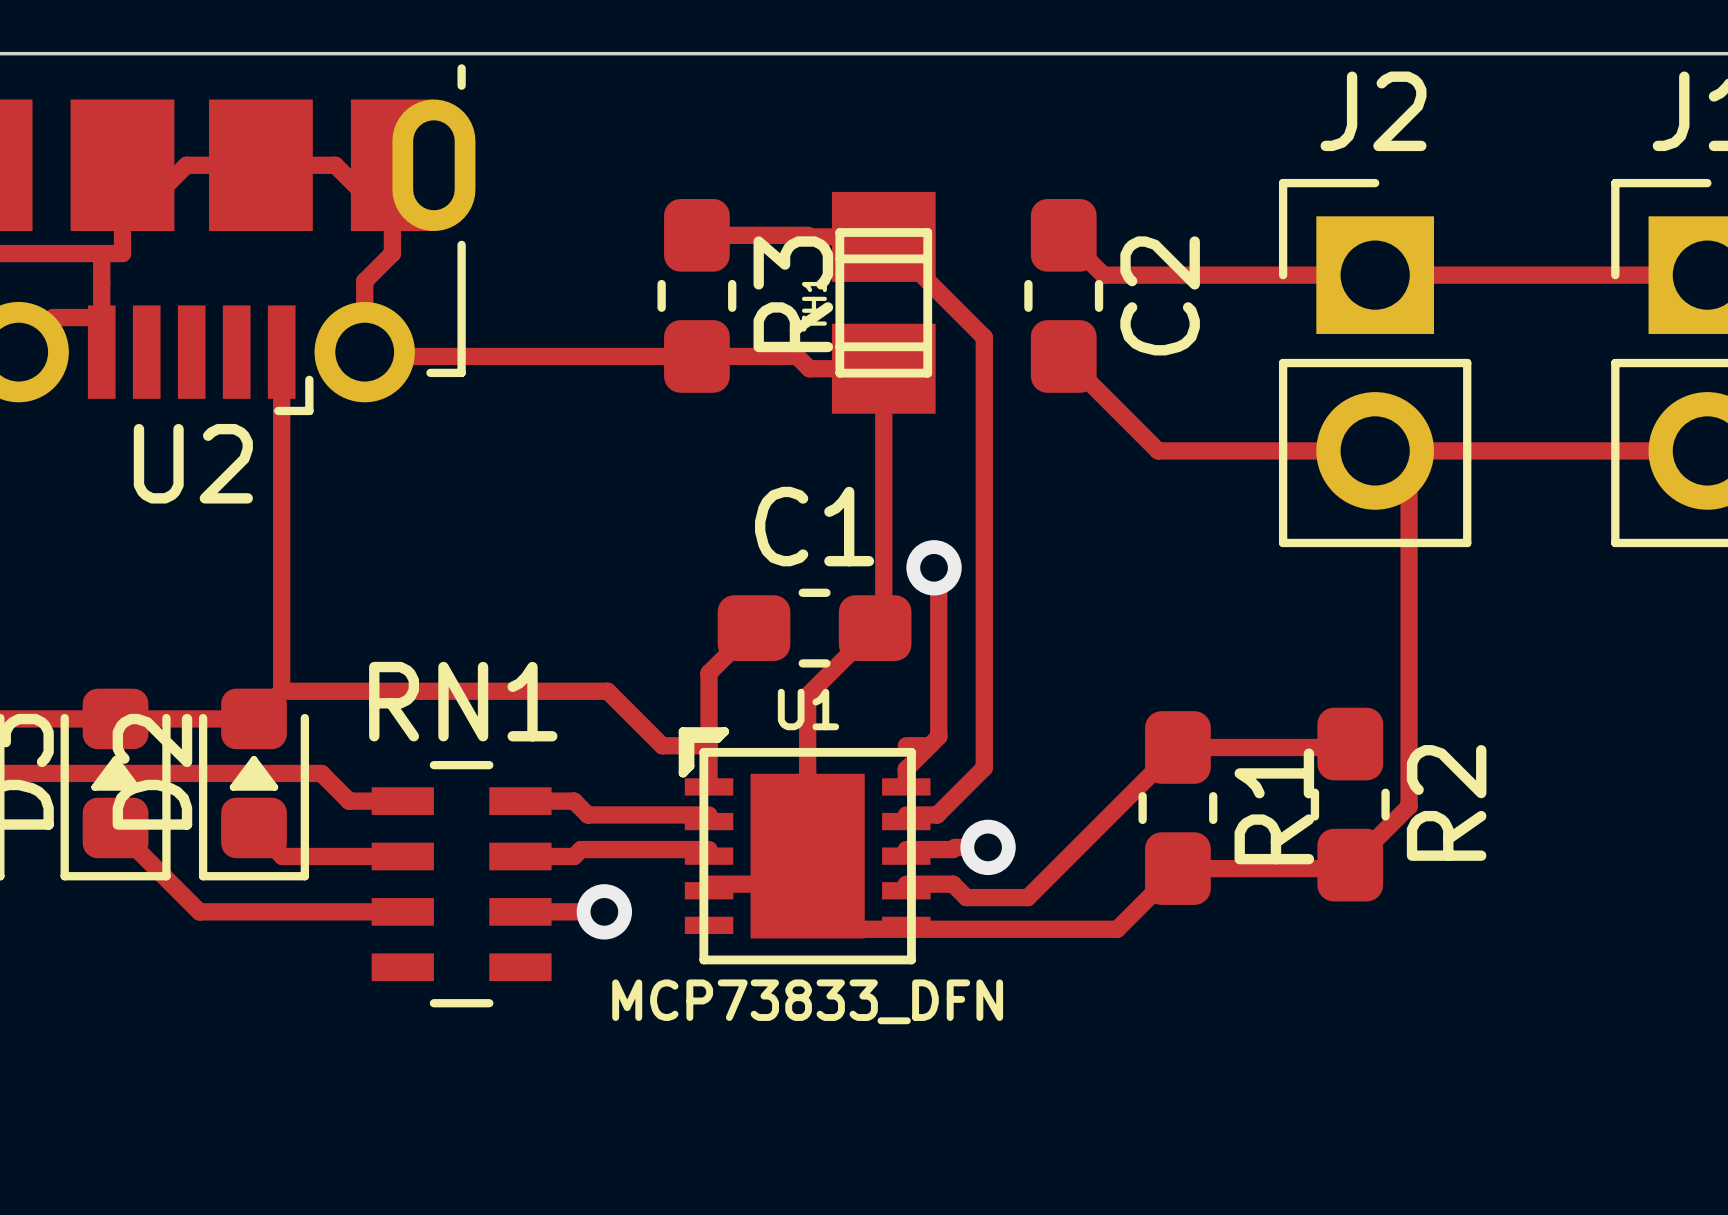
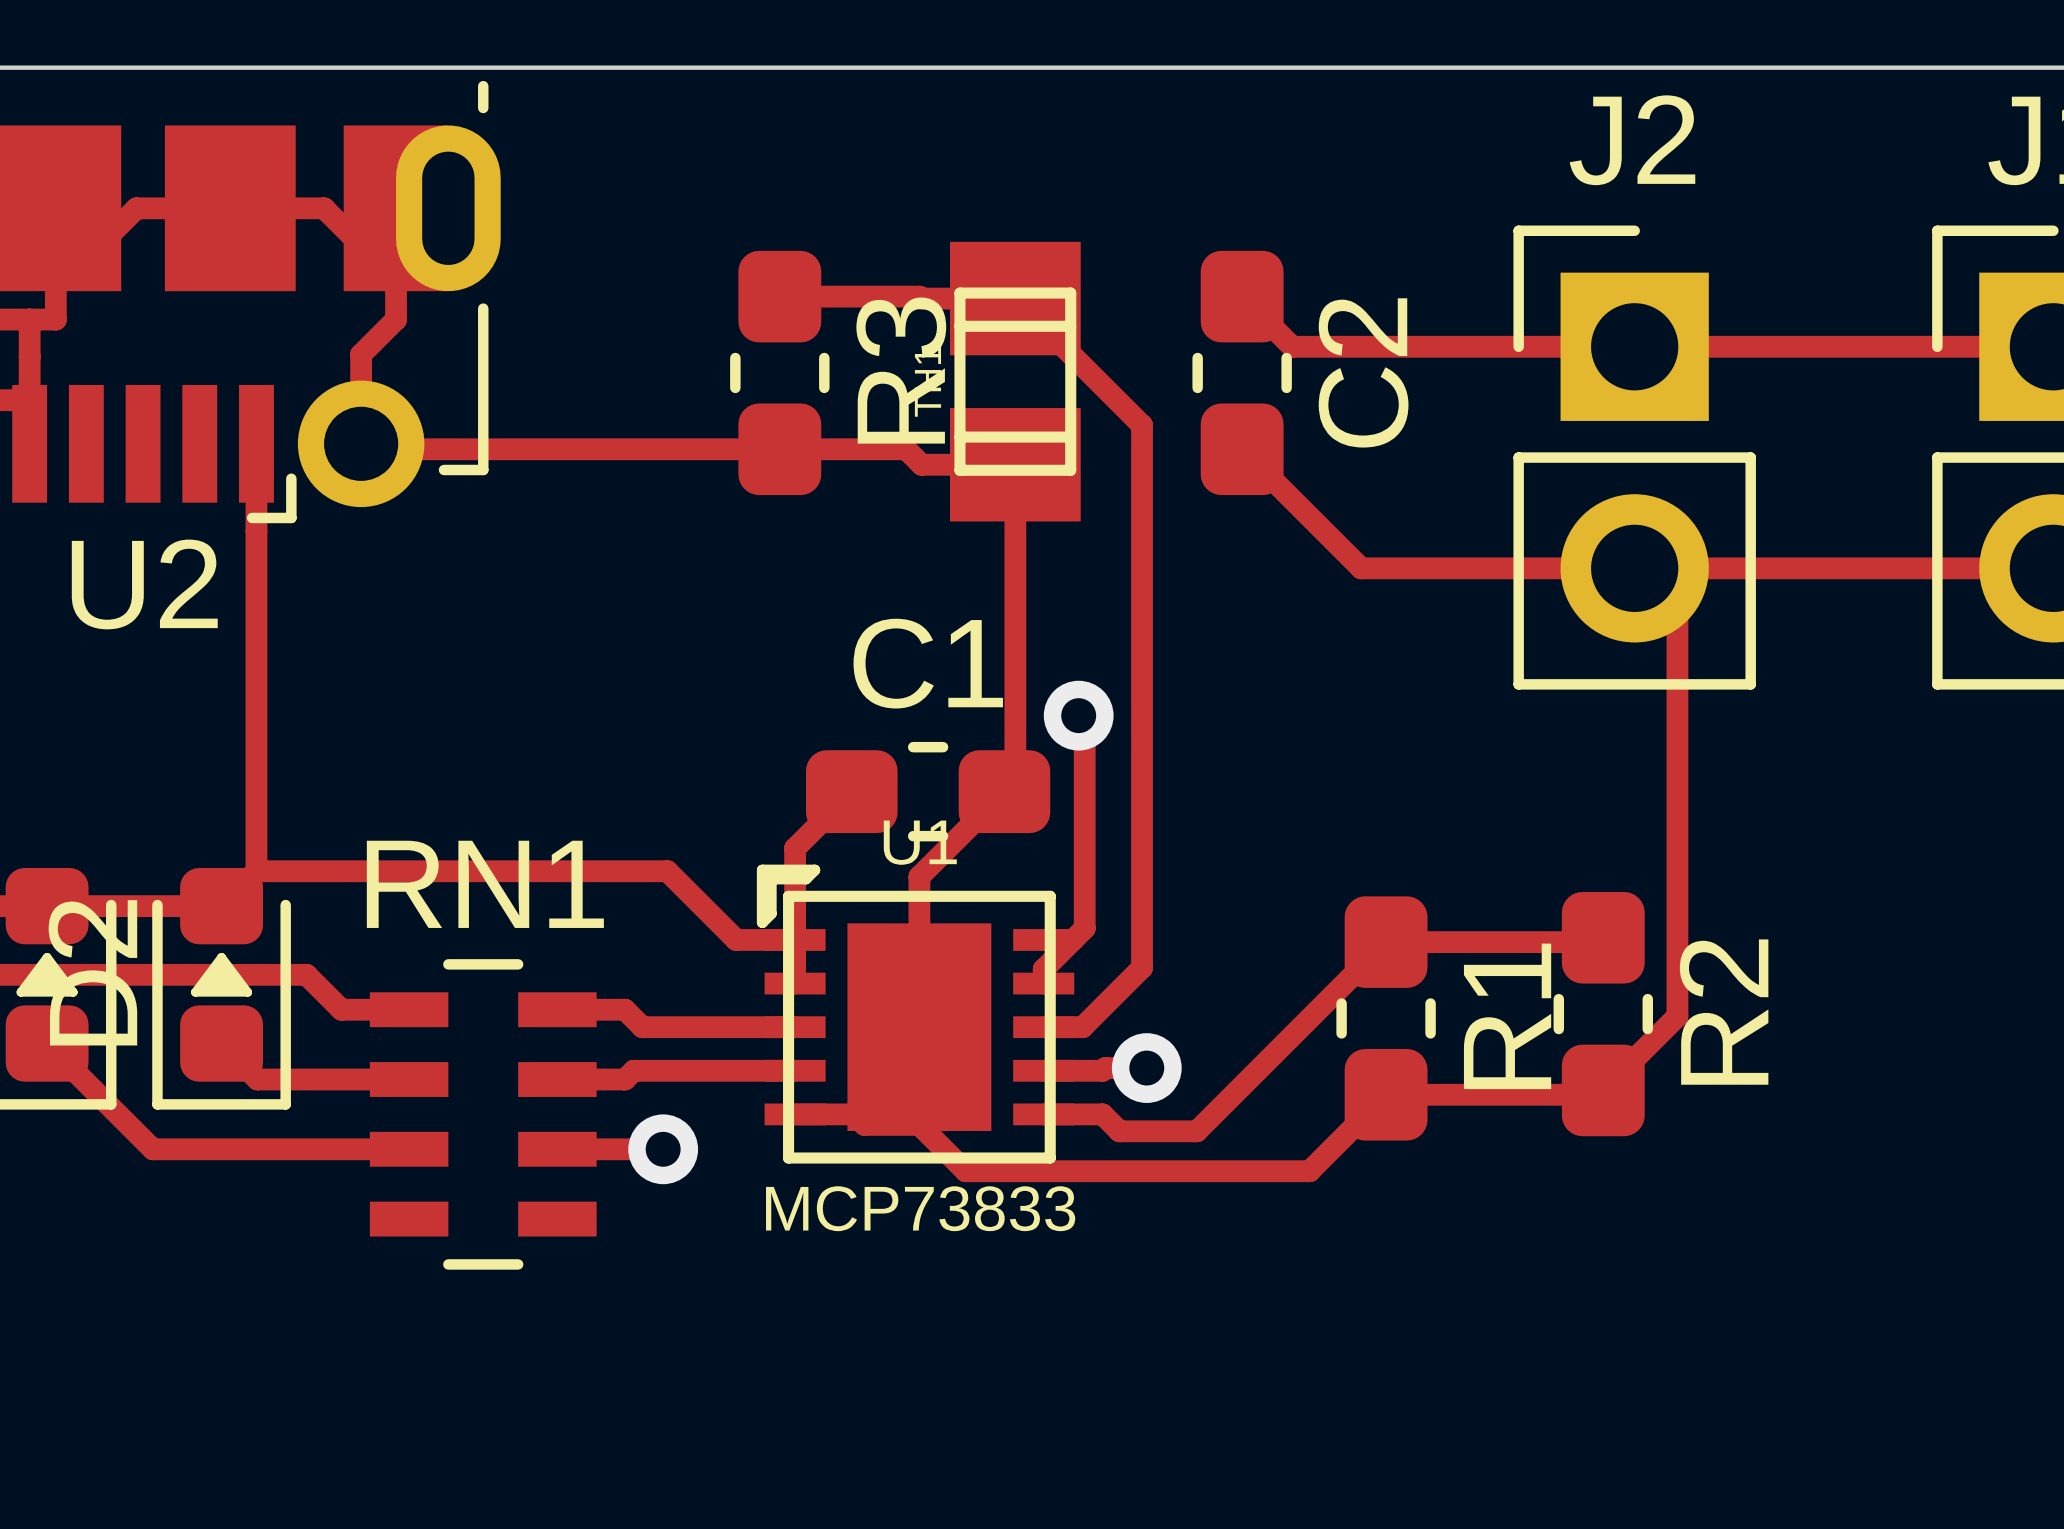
U1 position: (804, 845) -> (915, 1014)
U1 value: MCP73833_DFN (807, 1001) -> MCP73833 (920, 1208)

